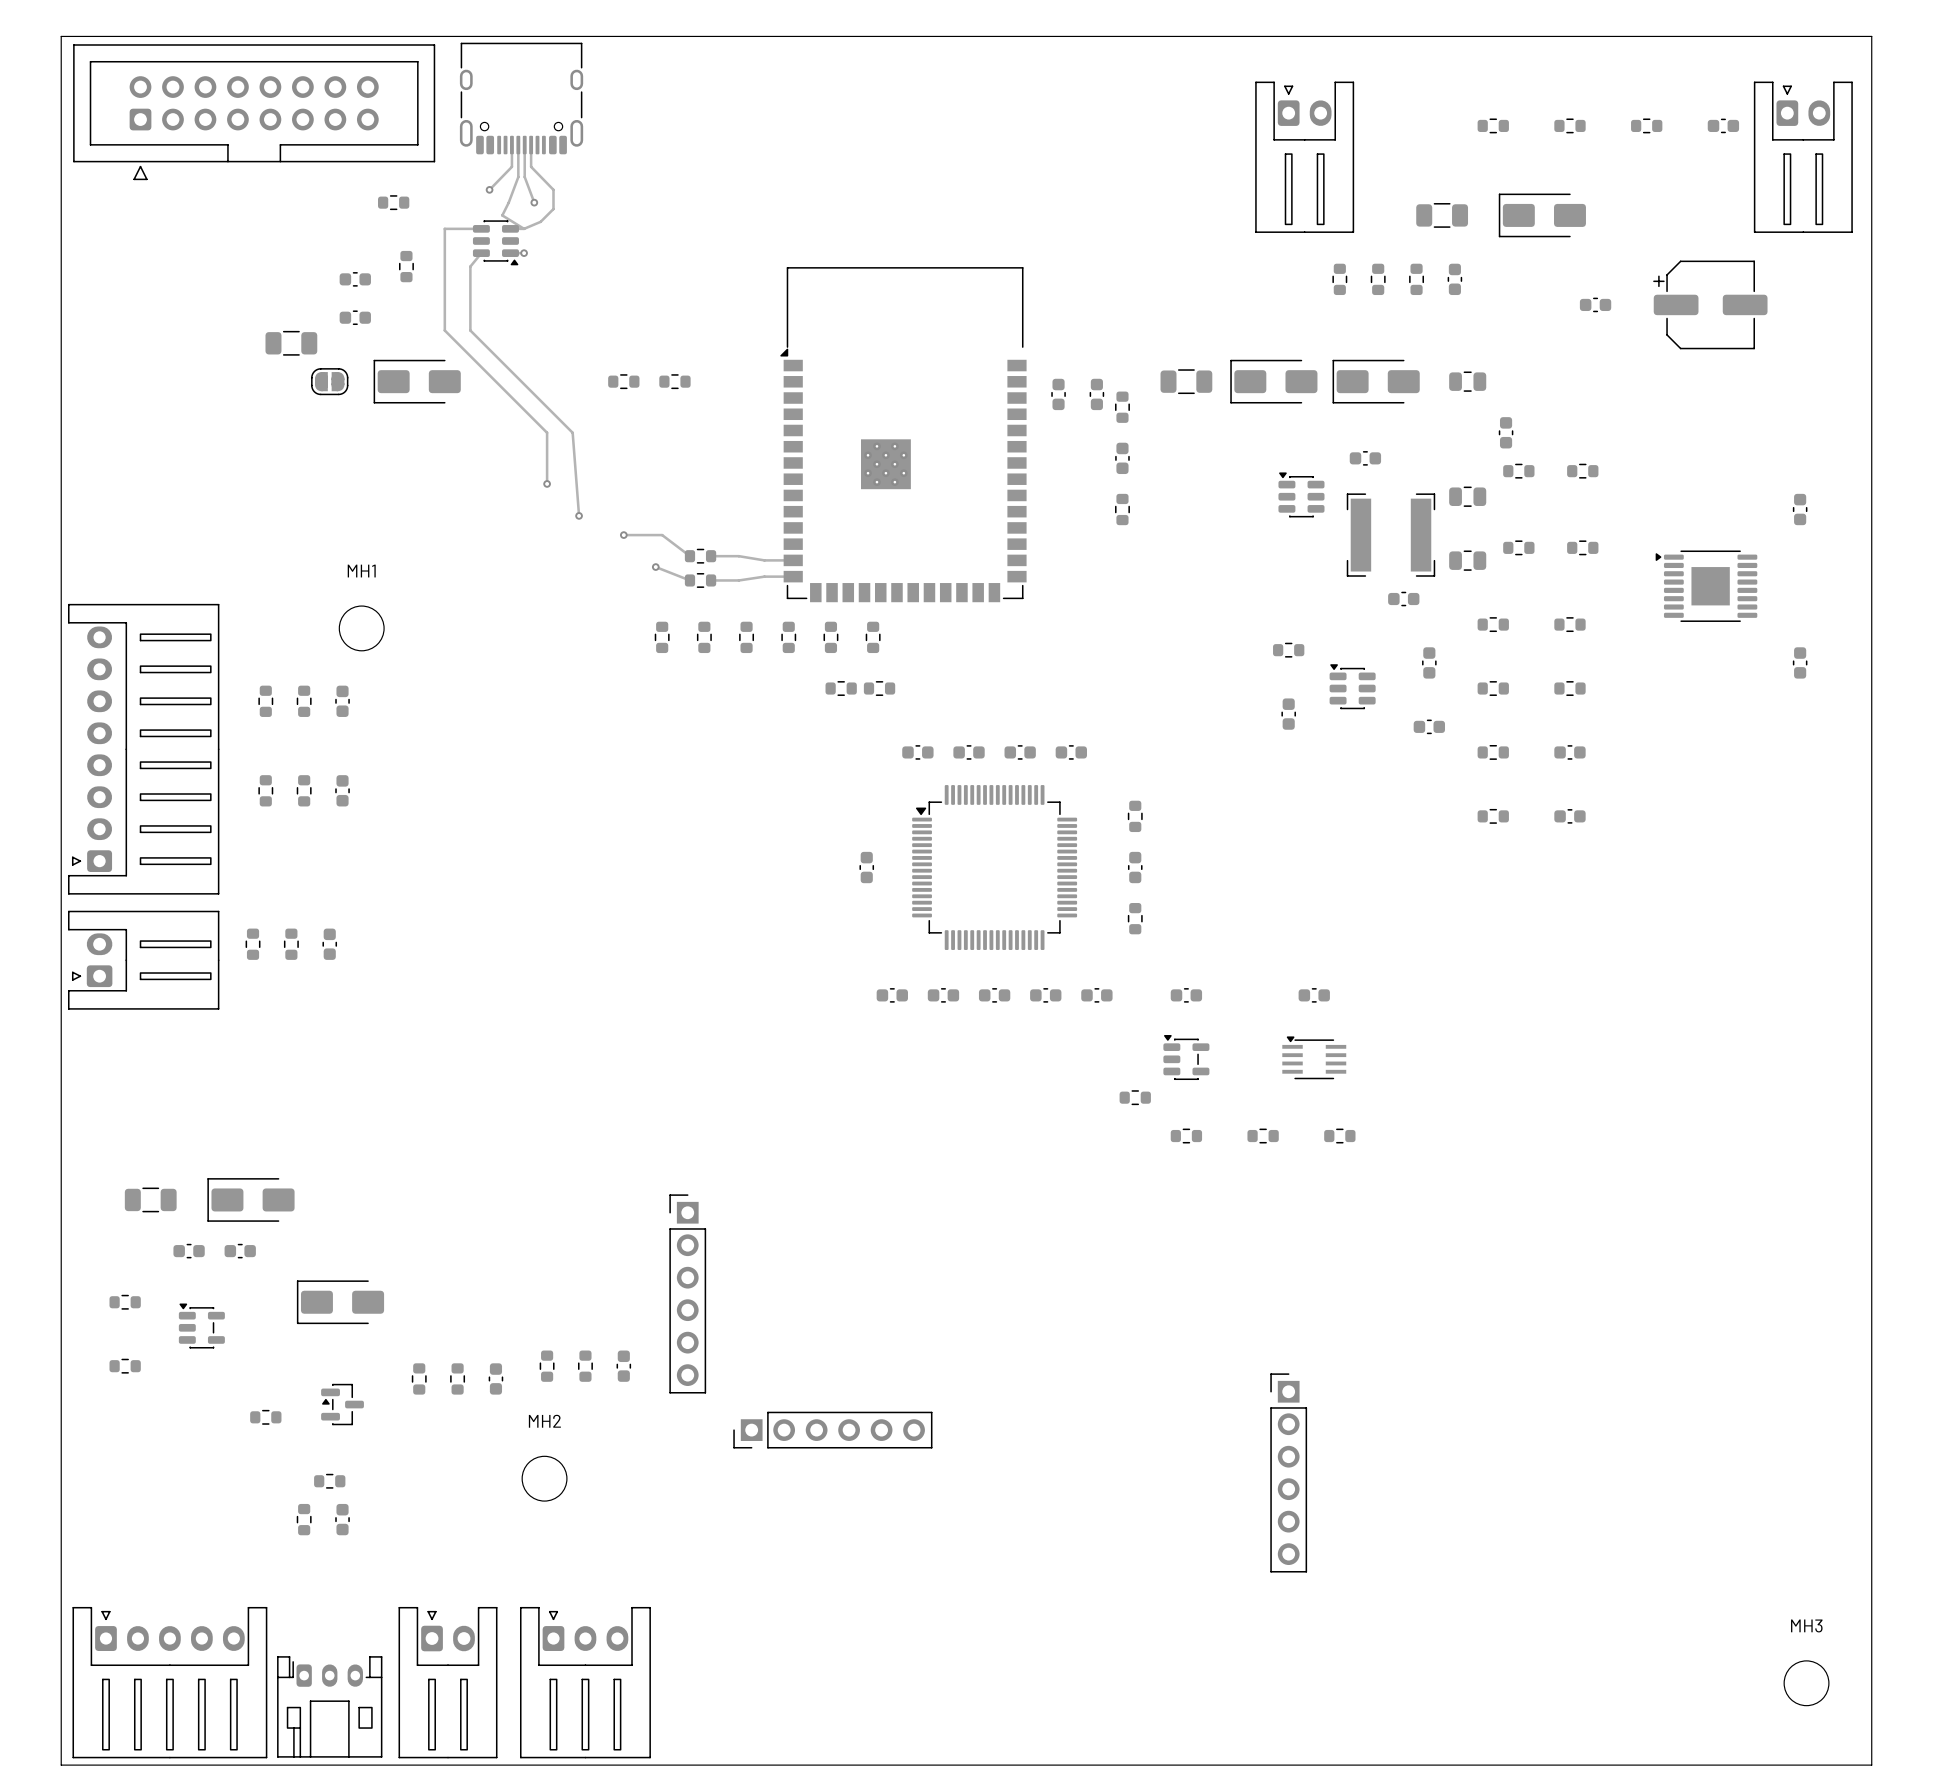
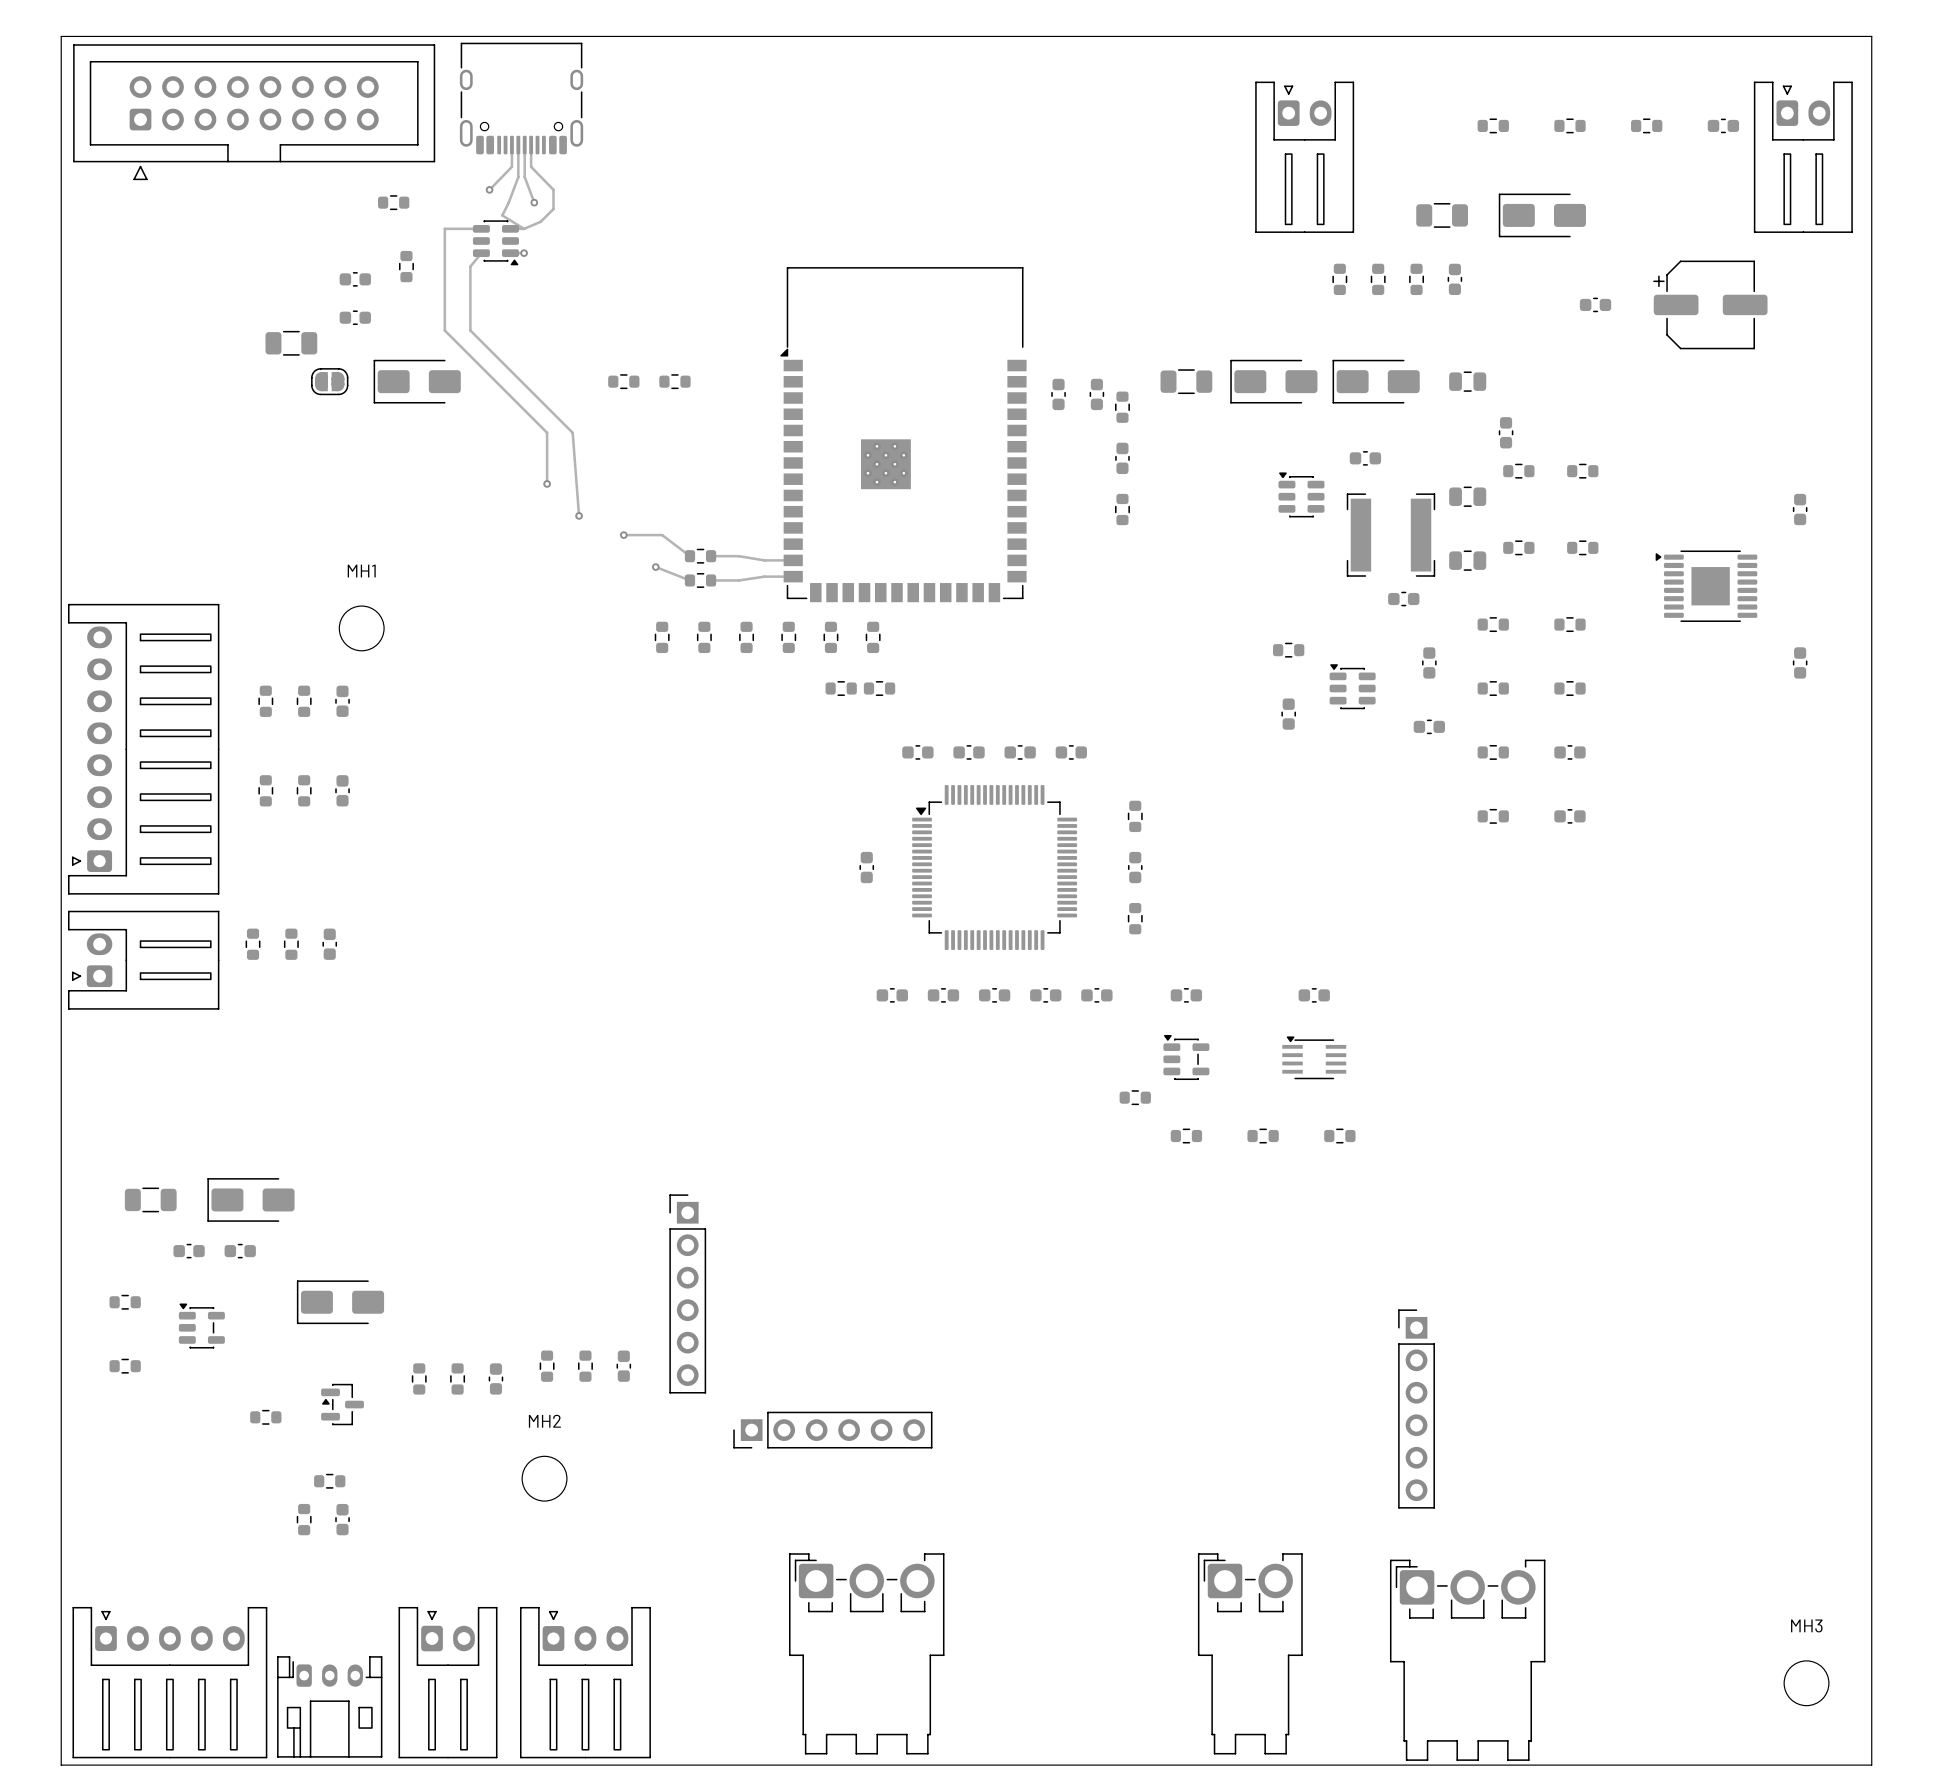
part position: (1288, 1472) -> (1416, 1409)
part: none -> (866, 1653)
part: none -> (1250, 1653)
part: none -> (1467, 1660)

